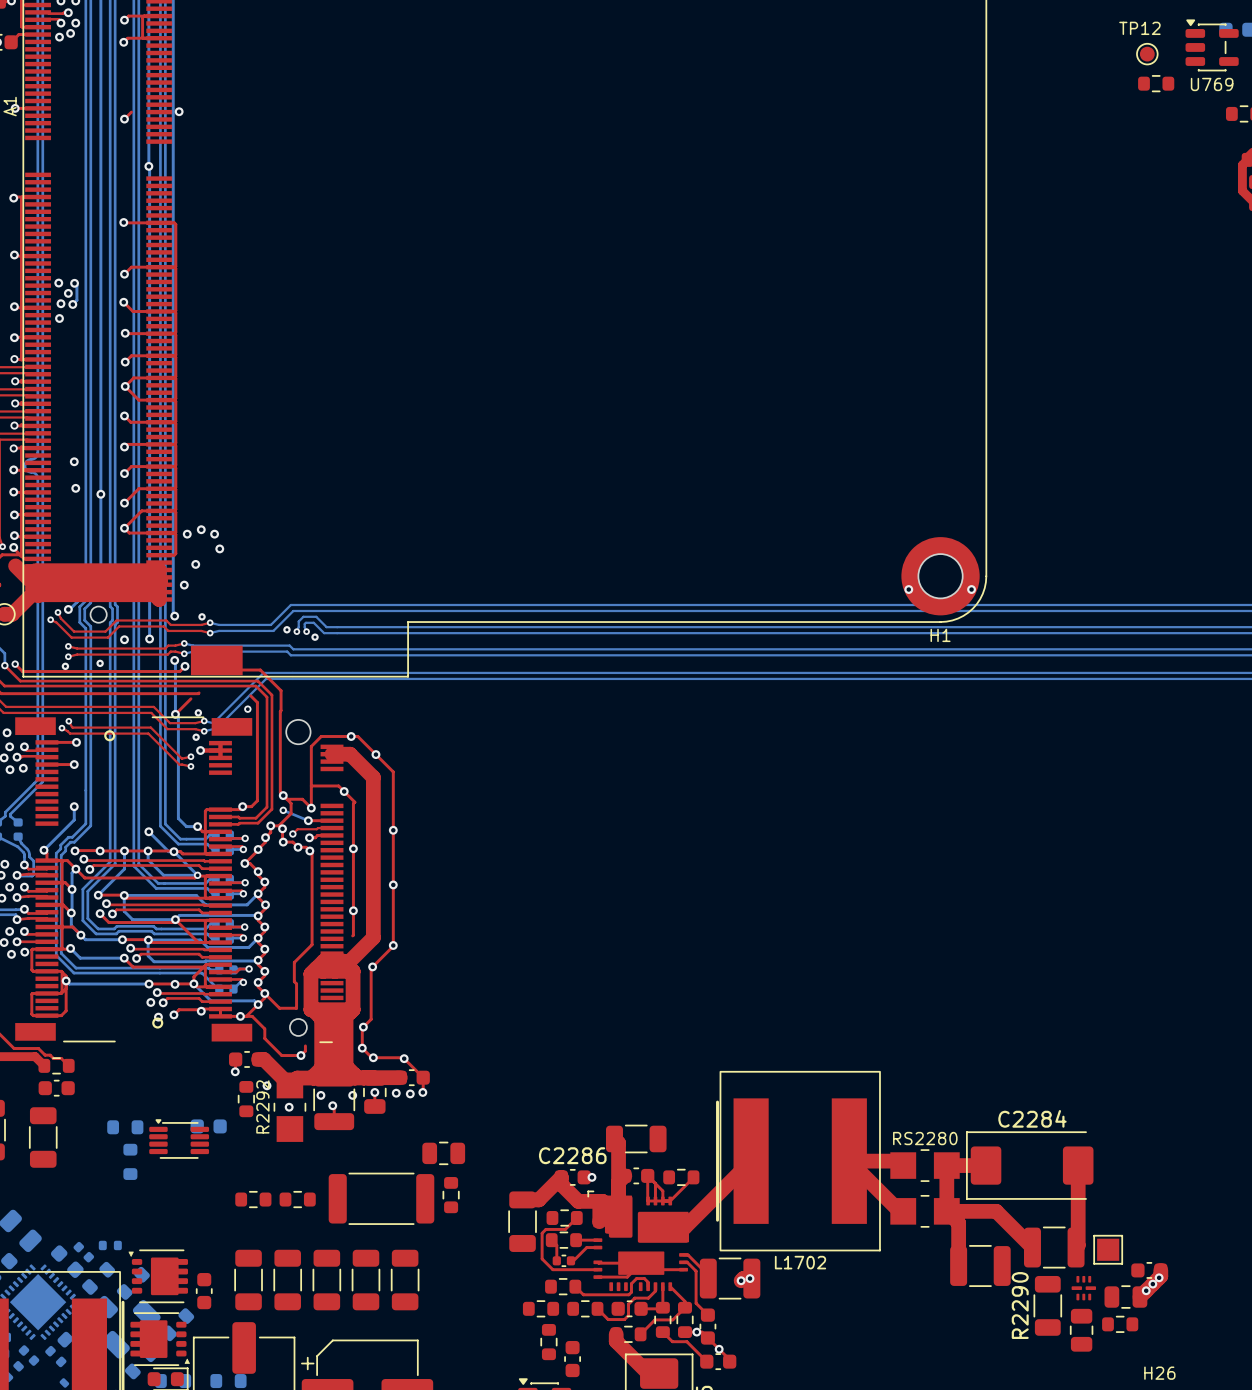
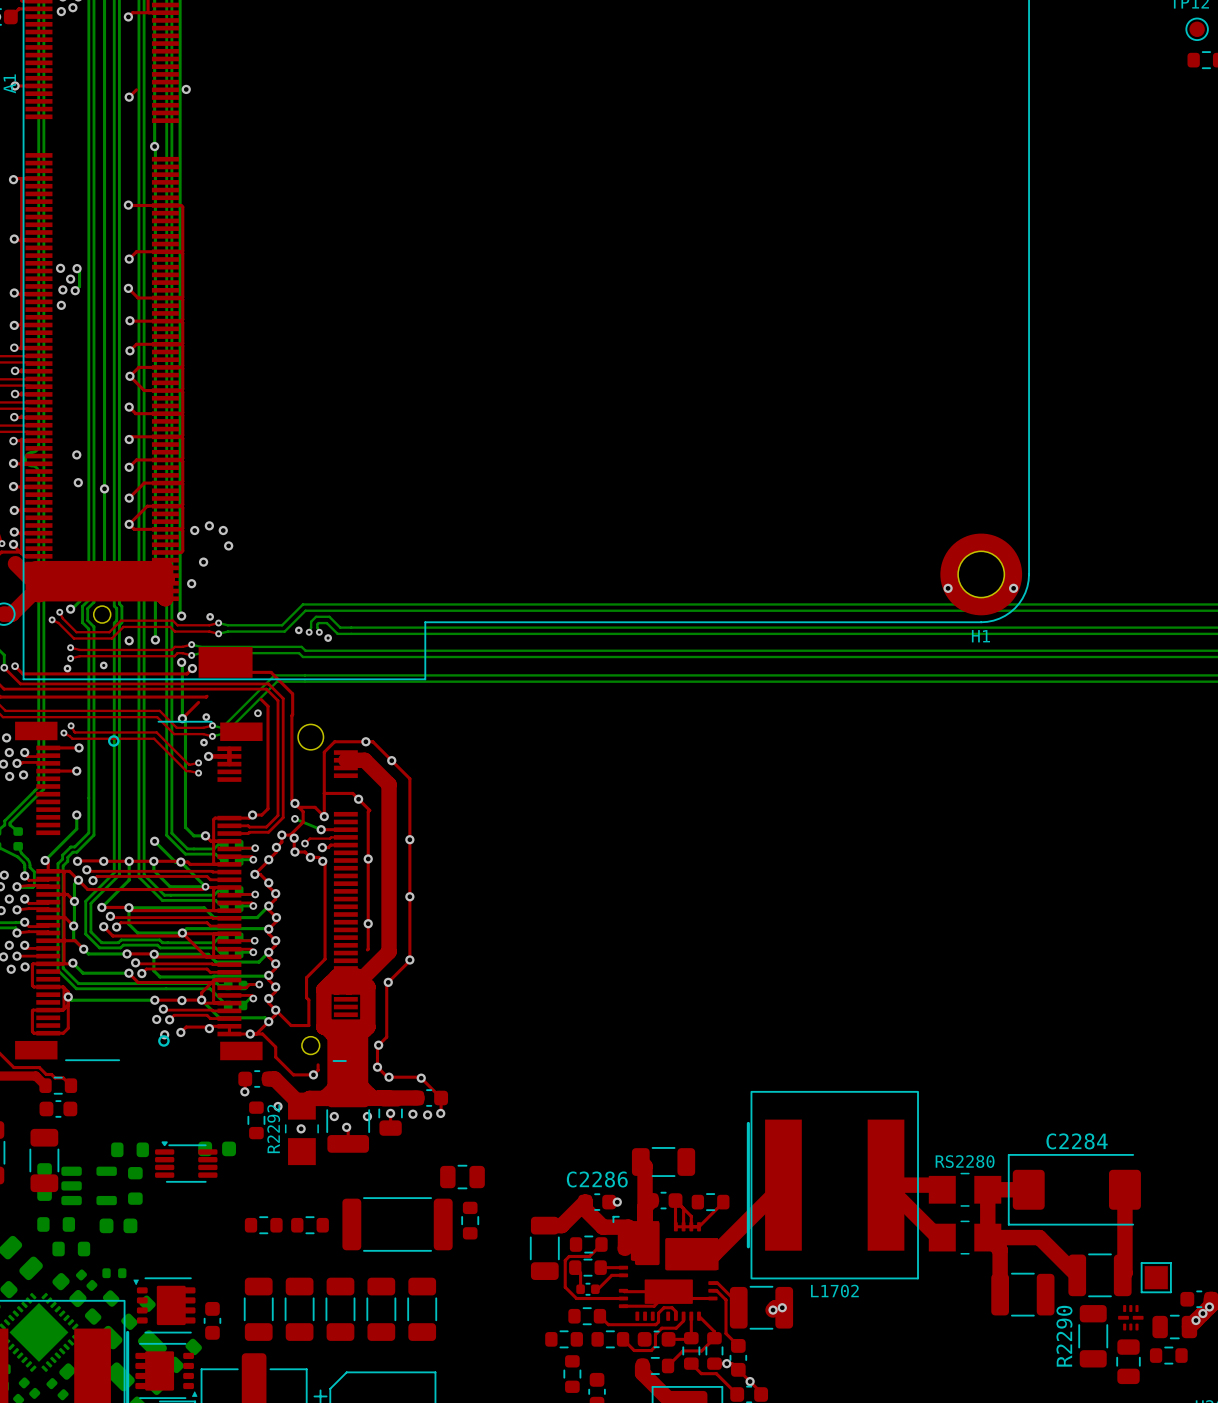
part: none -> (44, 1182)
part: none -> (89, 1185)
part: none -> (56, 1224)
part: none -> (118, 1225)
part: none -> (71, 1249)

